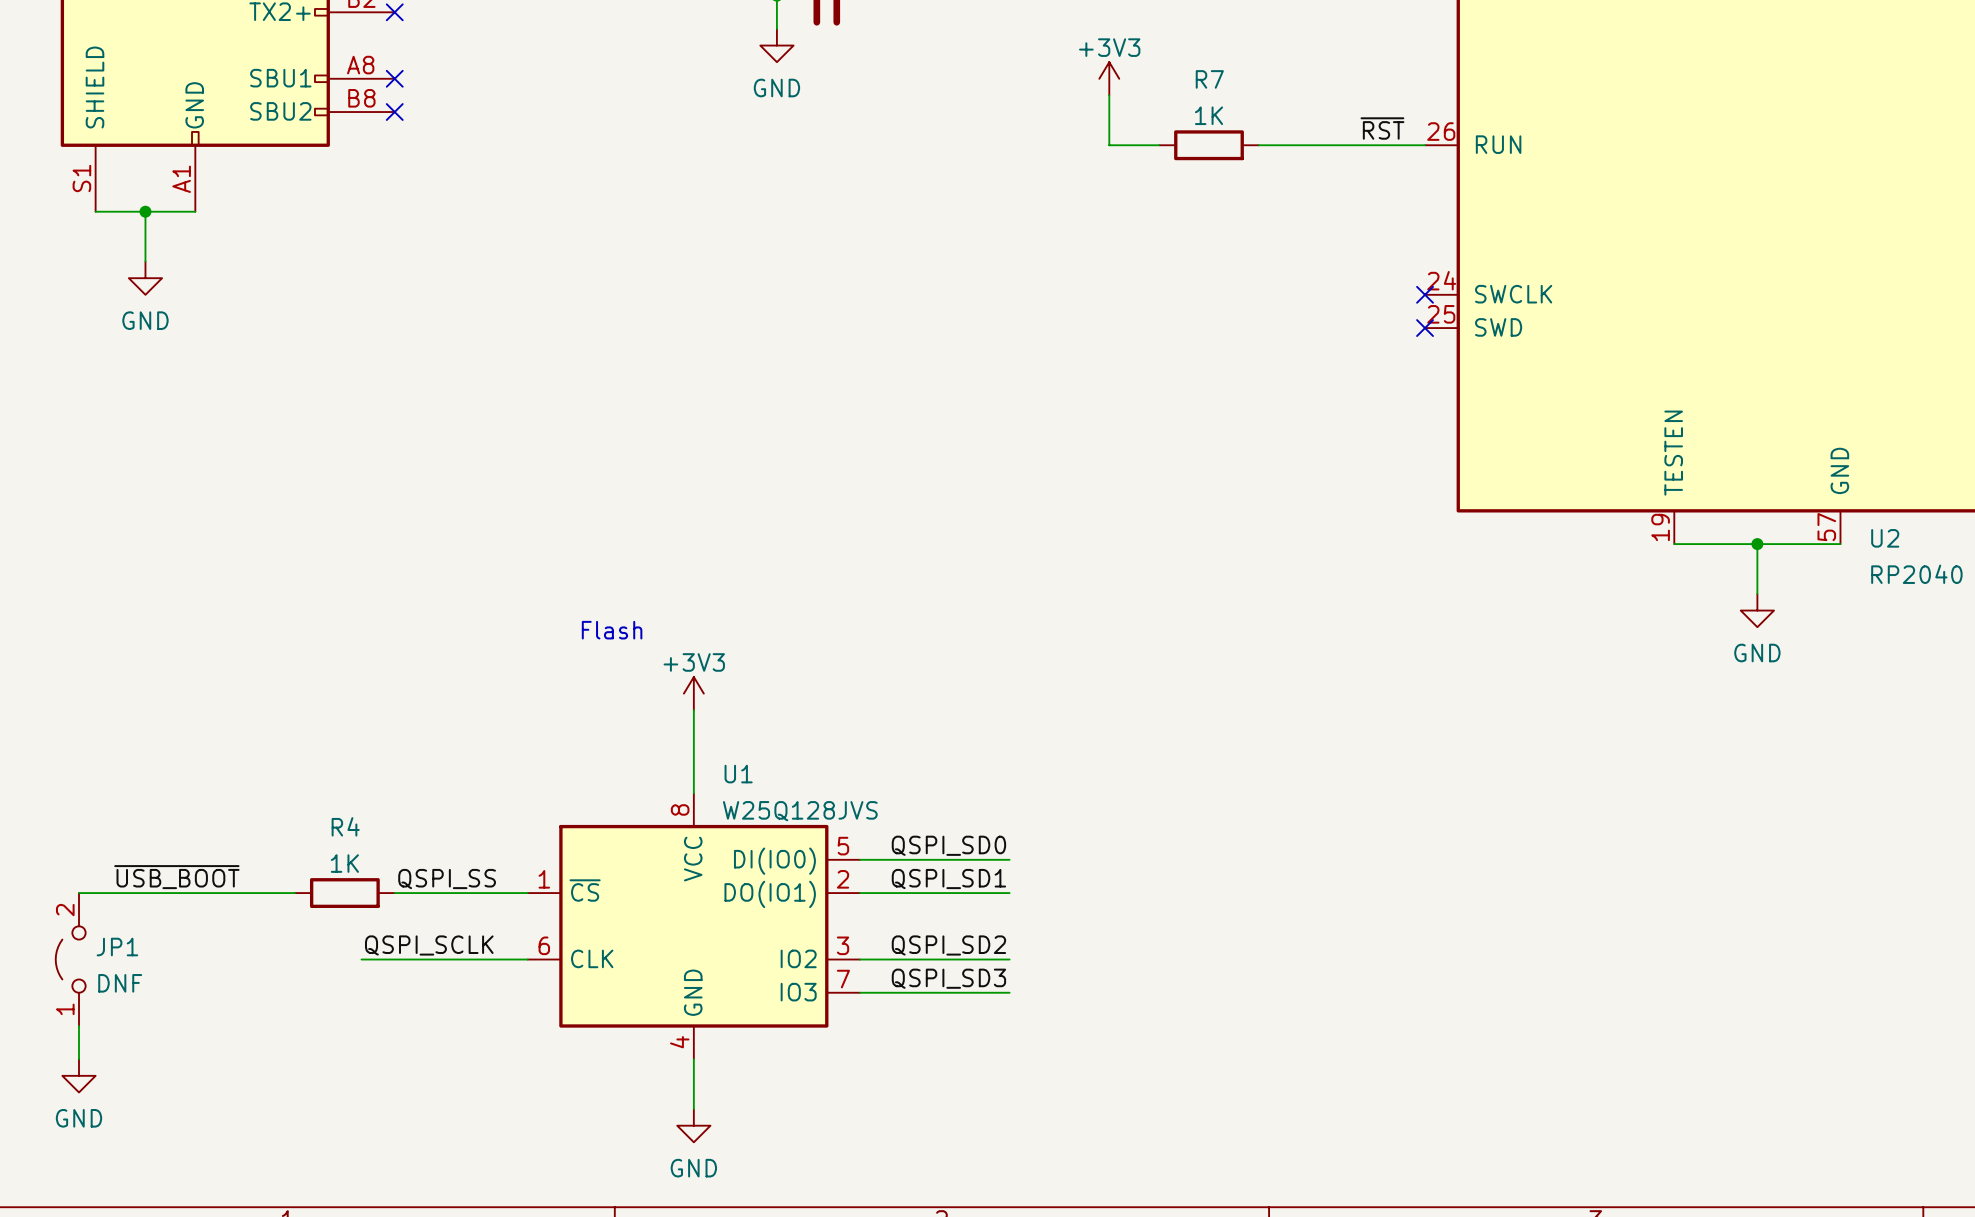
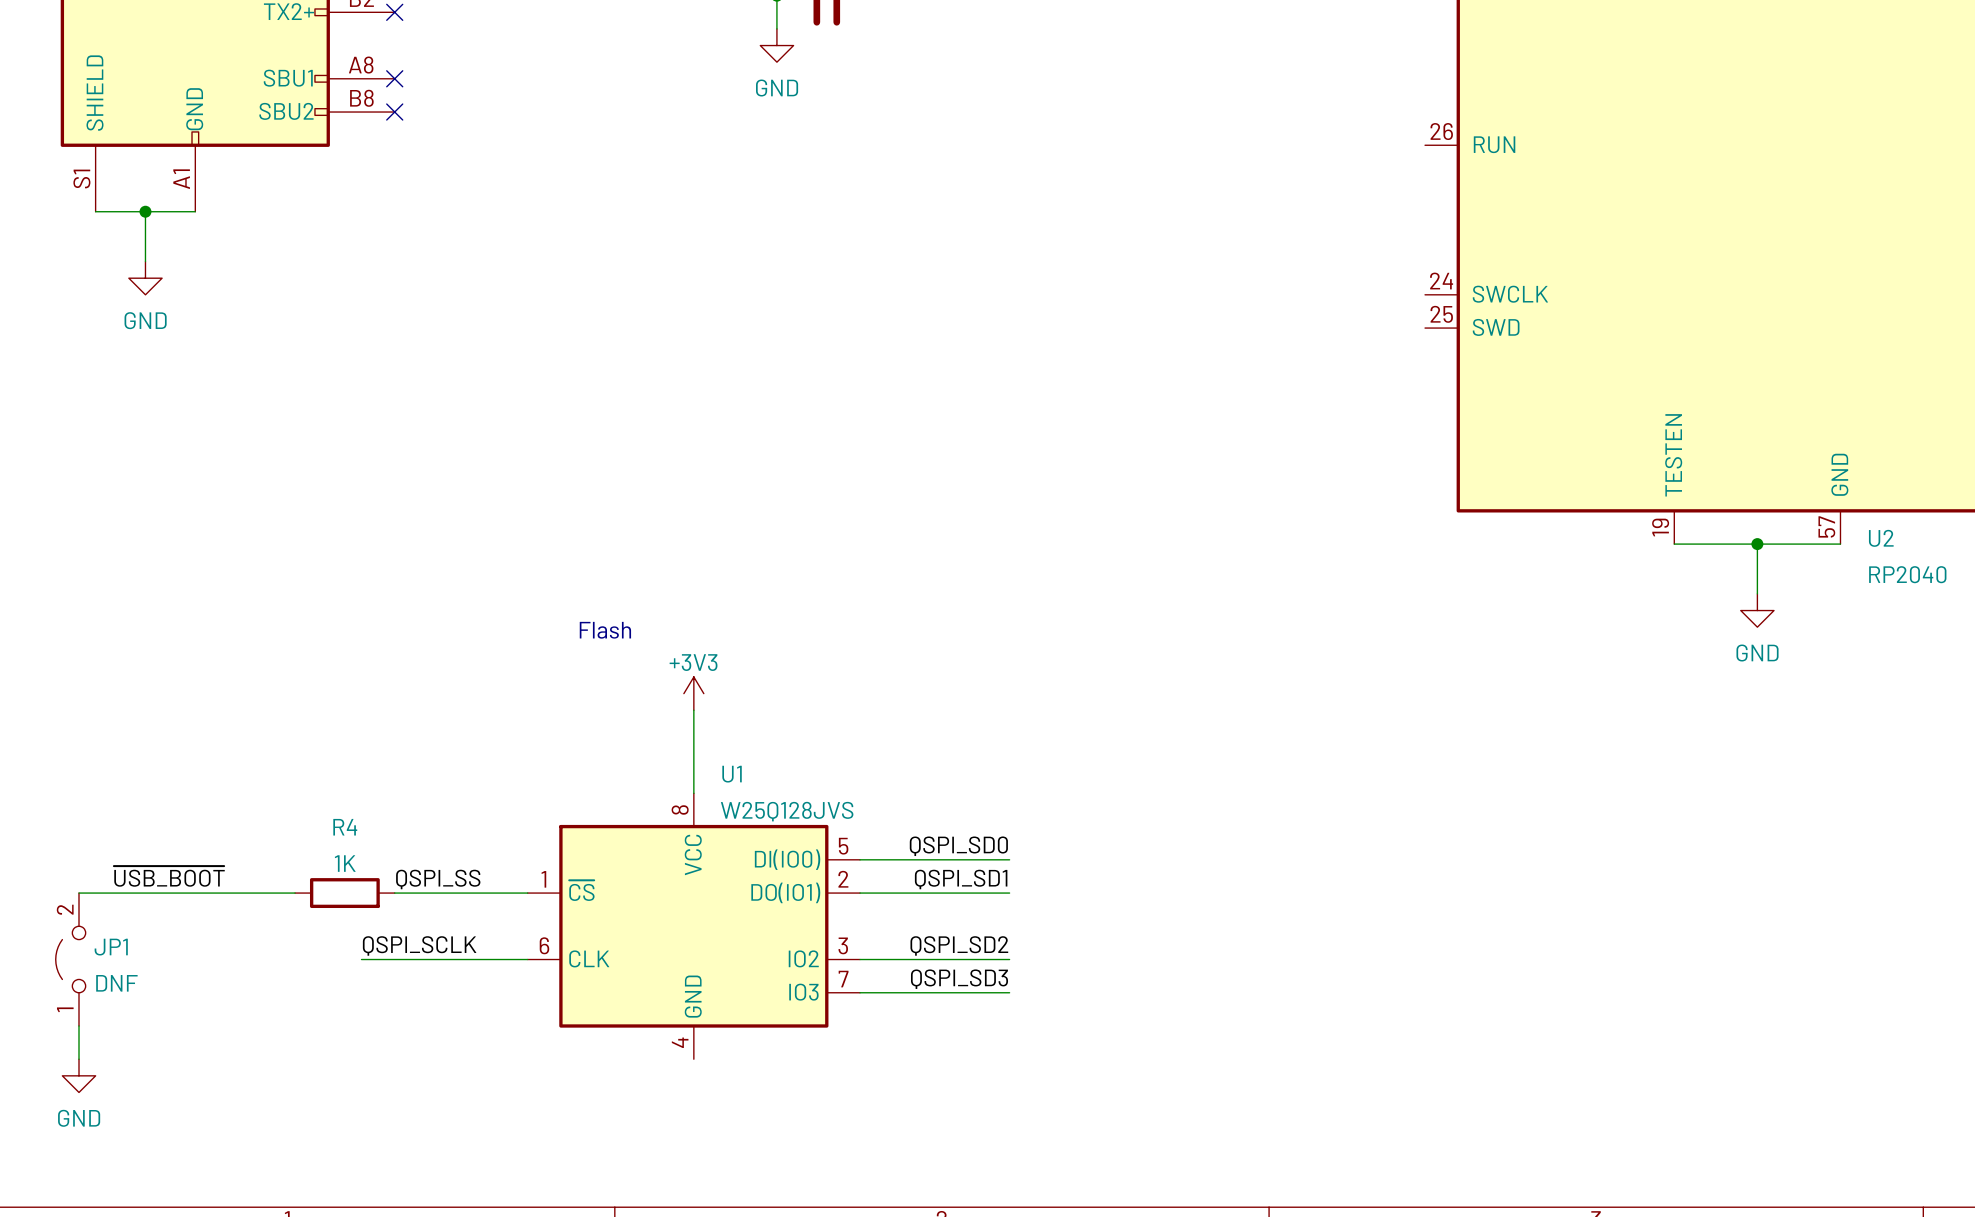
power symbol: +3V3 (1109, 78) -> none
wire: (1109, 95) (1109, 145) (1159, 145) -> none
label: ~{RST} (1382, 128) -> none
R7: 1K (1209, 145) -> none
wire: (1258, 145) (1425, 145) -> none
no-connect mark: (1425, 294) -> none
no-connect mark: (1425, 328) -> none
wire: (693, 1059) (693, 1109) -> none
power symbol: GND (693, 1125) -> none

